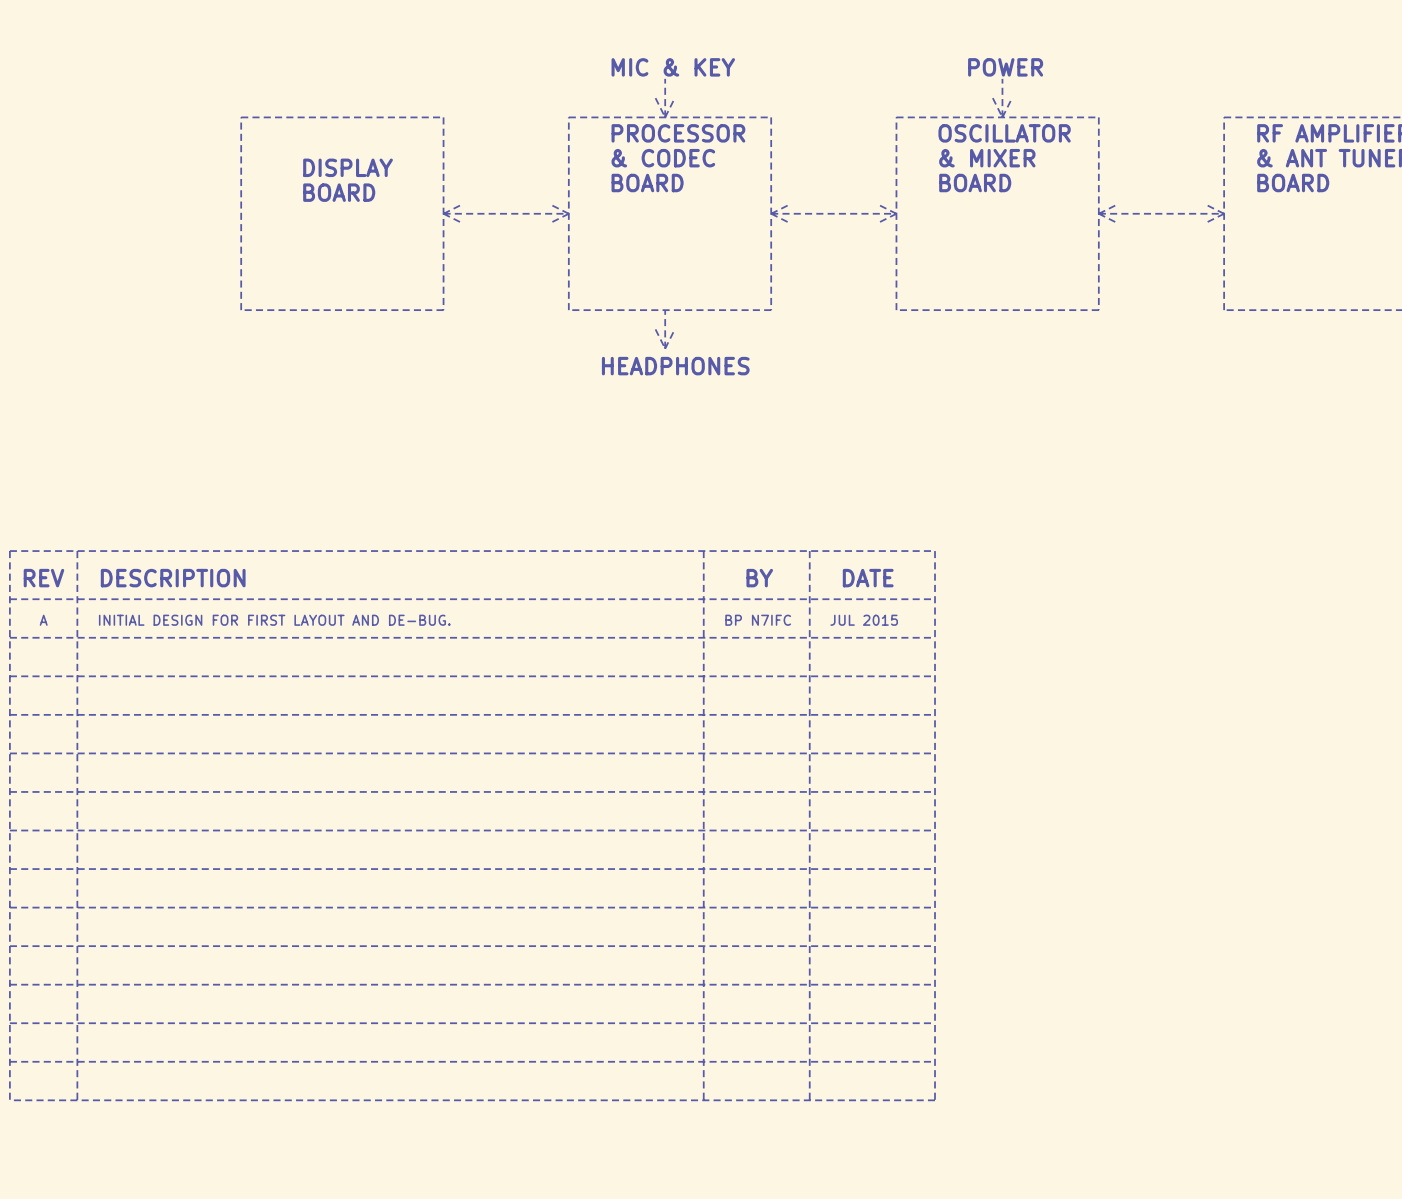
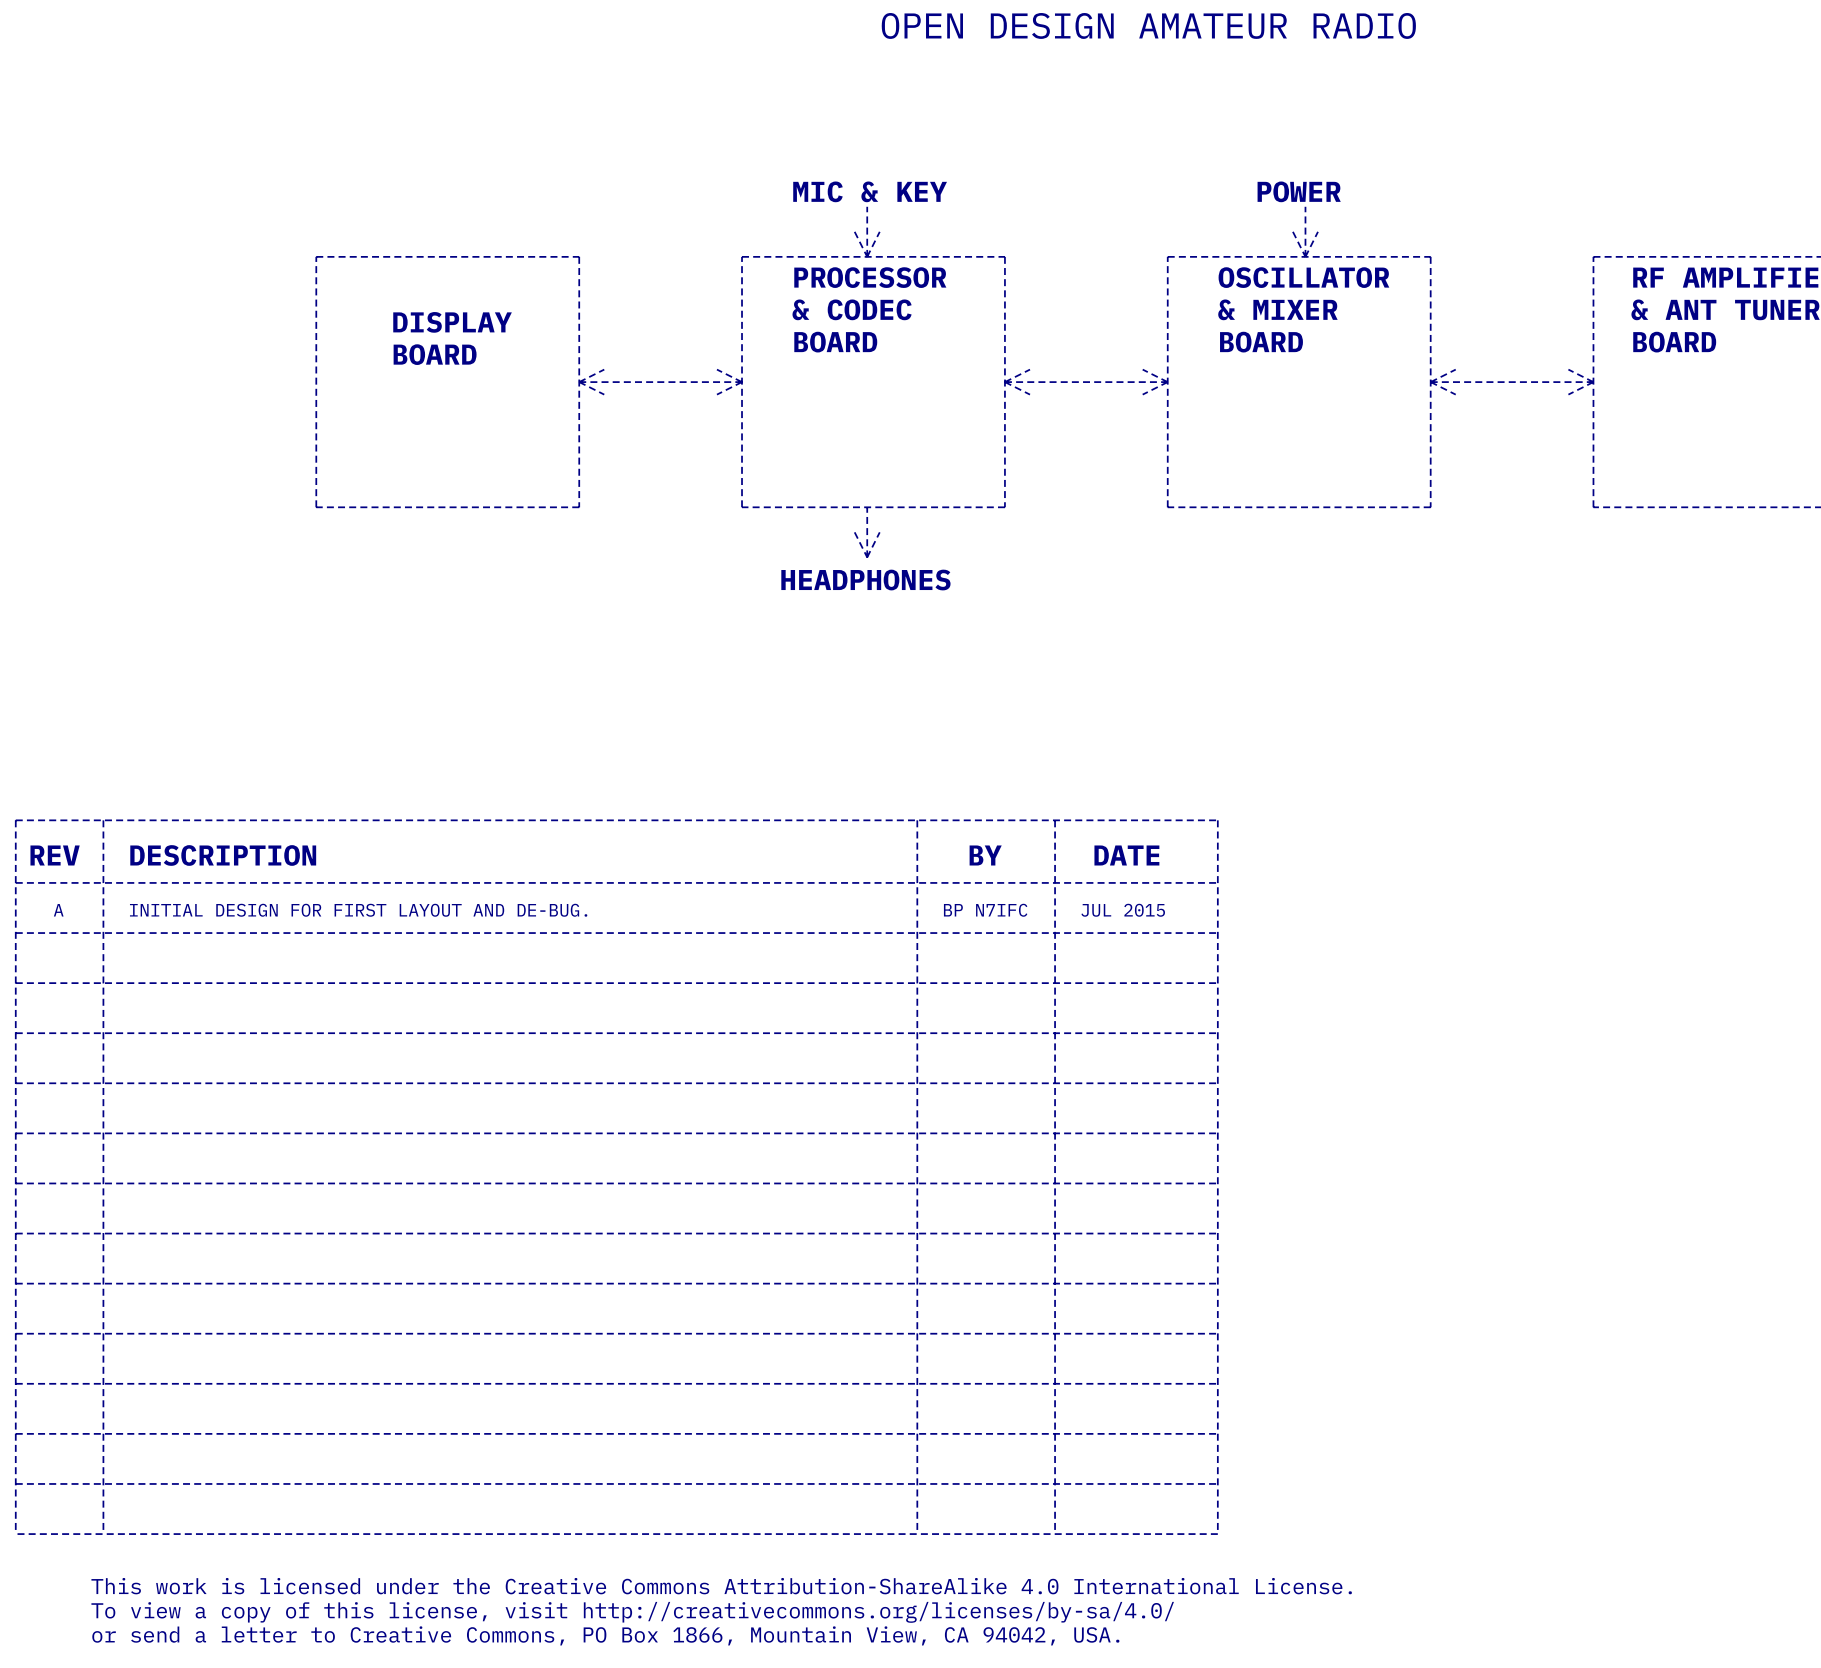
text: none -> This work is licensed under the Creative Commons Attribution-ShareAlike 4.0 International License. (721, 1586)
text: none -> To view a copy of this license, visit http://creativecommons.org/licenses/by-sa/4.0/ (632, 1612)
text: none -> or send a letter to Creative Commons, PO Box 1866, Mountain View, CA 94042, USA. (605, 1635)

